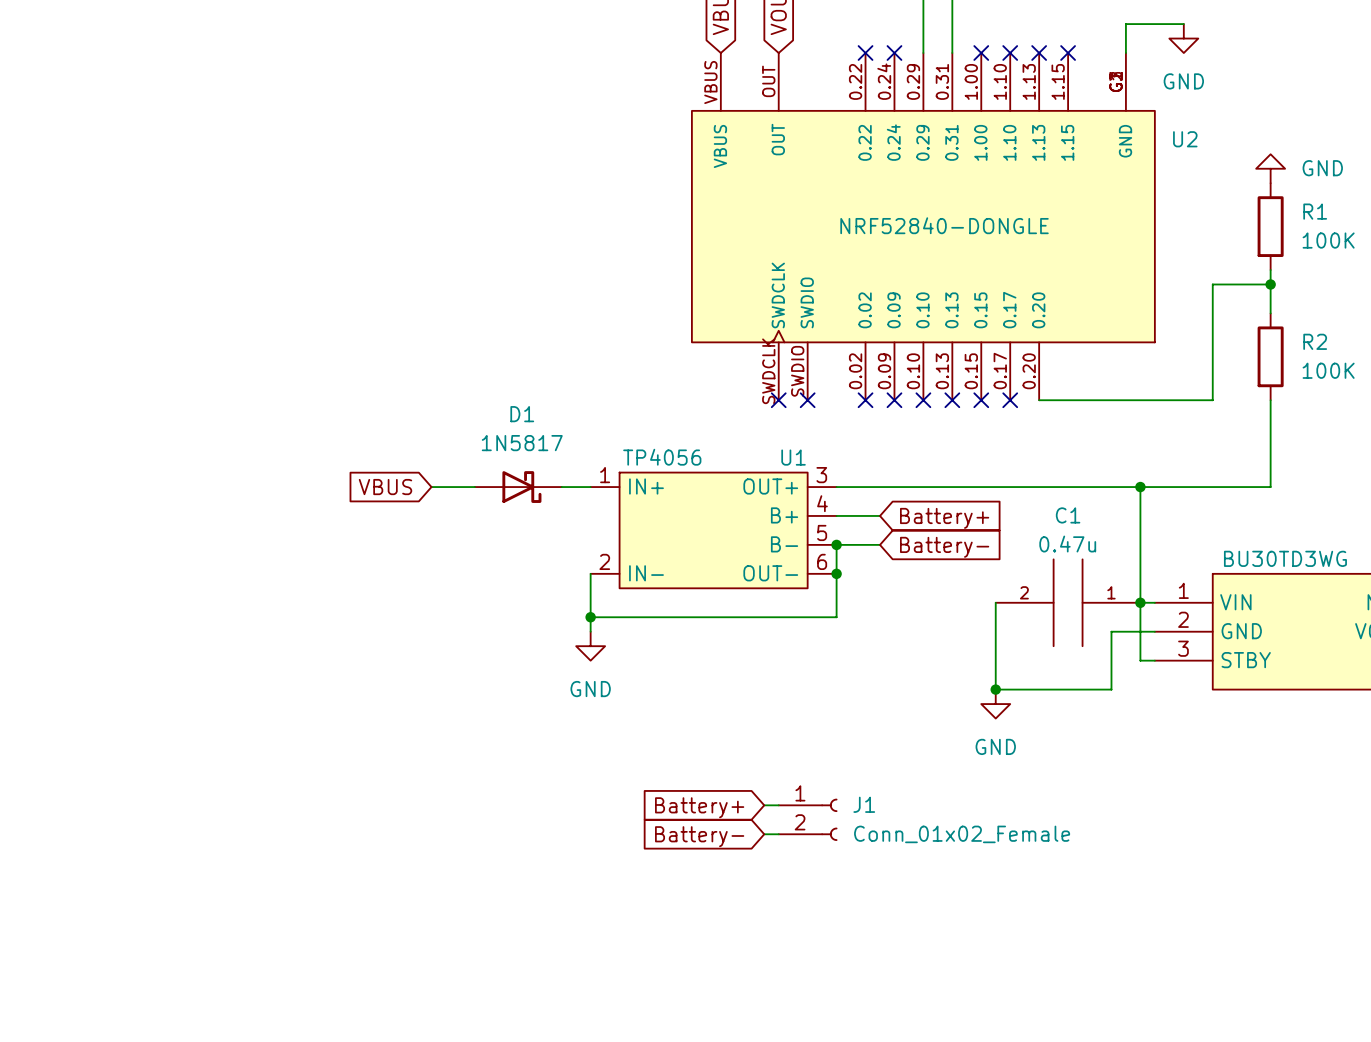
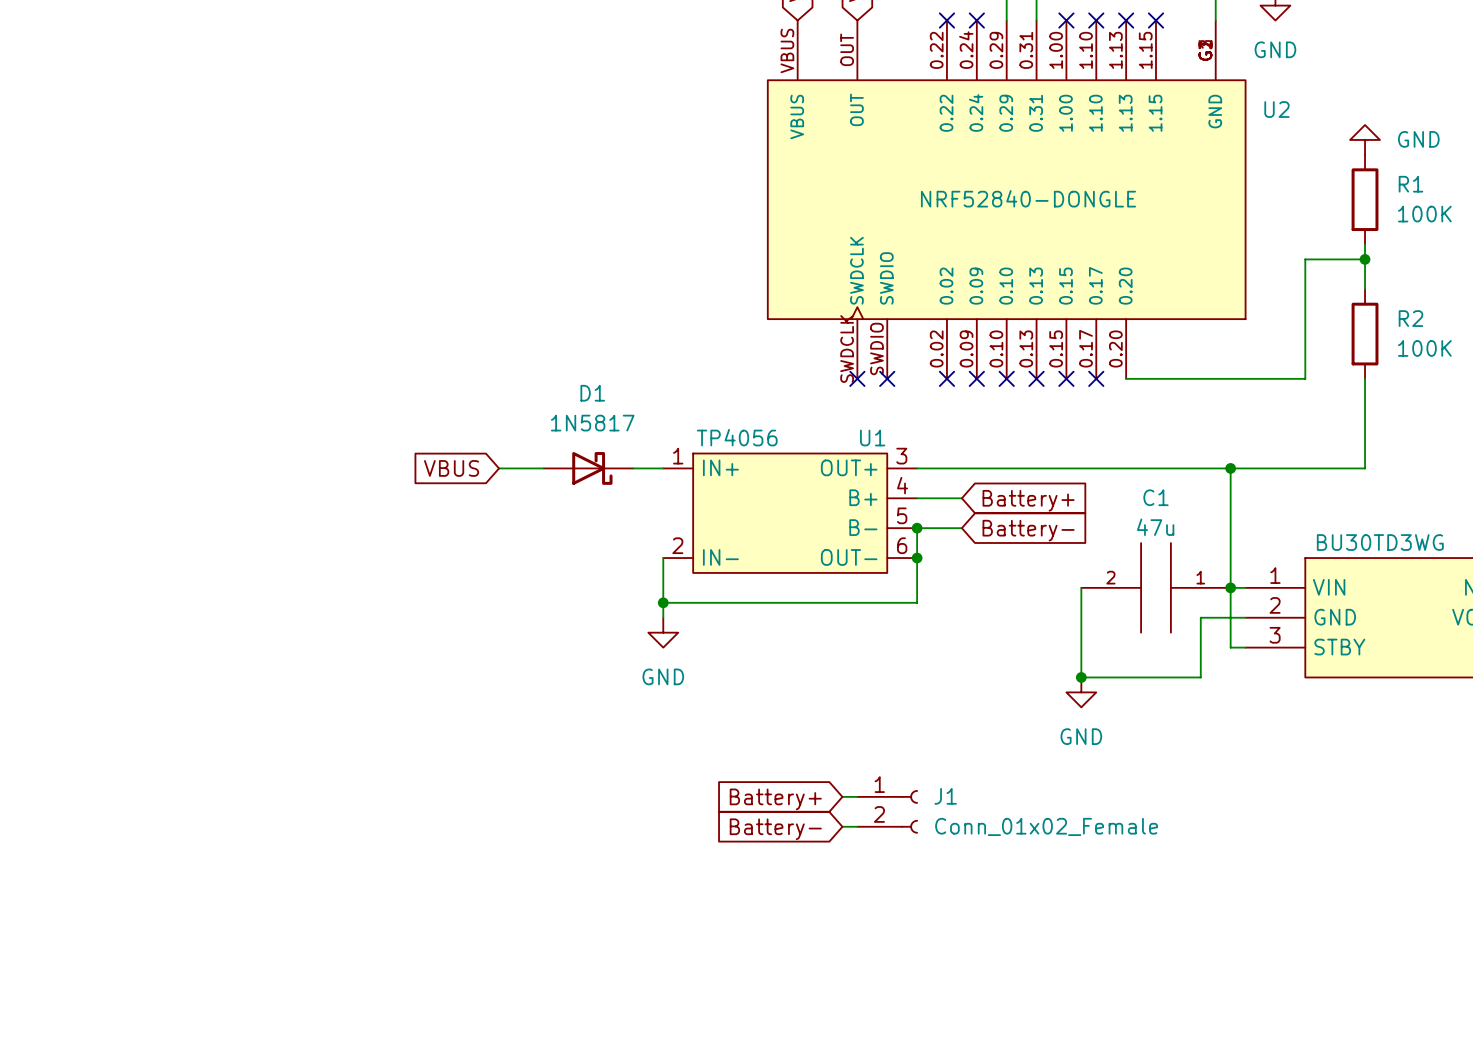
C1 value: 0.47u (1067, 544) -> 47u (1155, 527)

